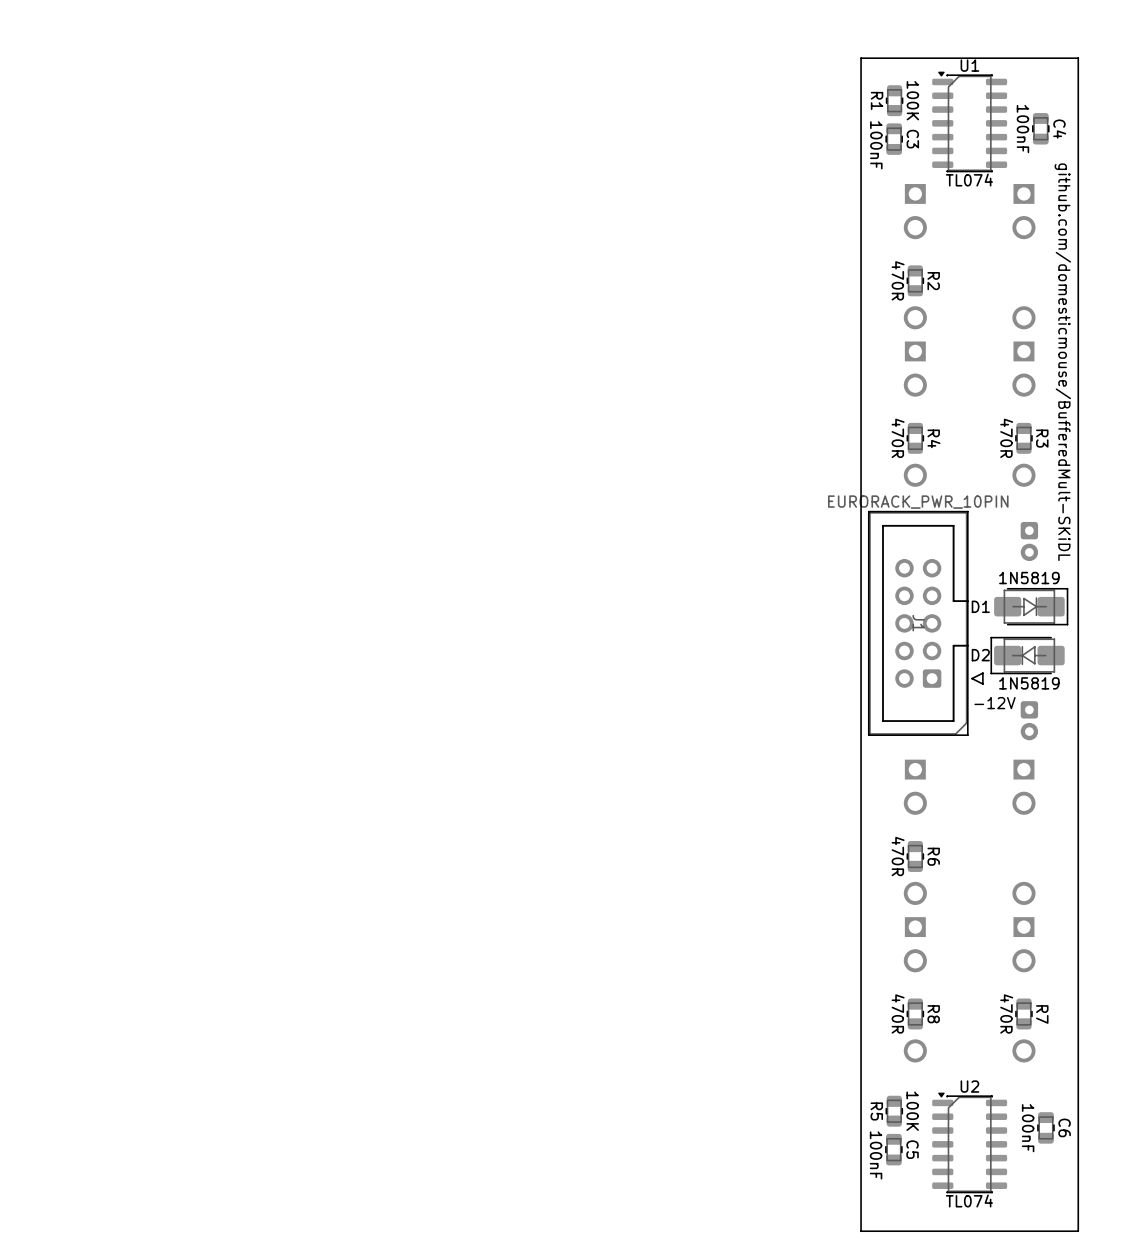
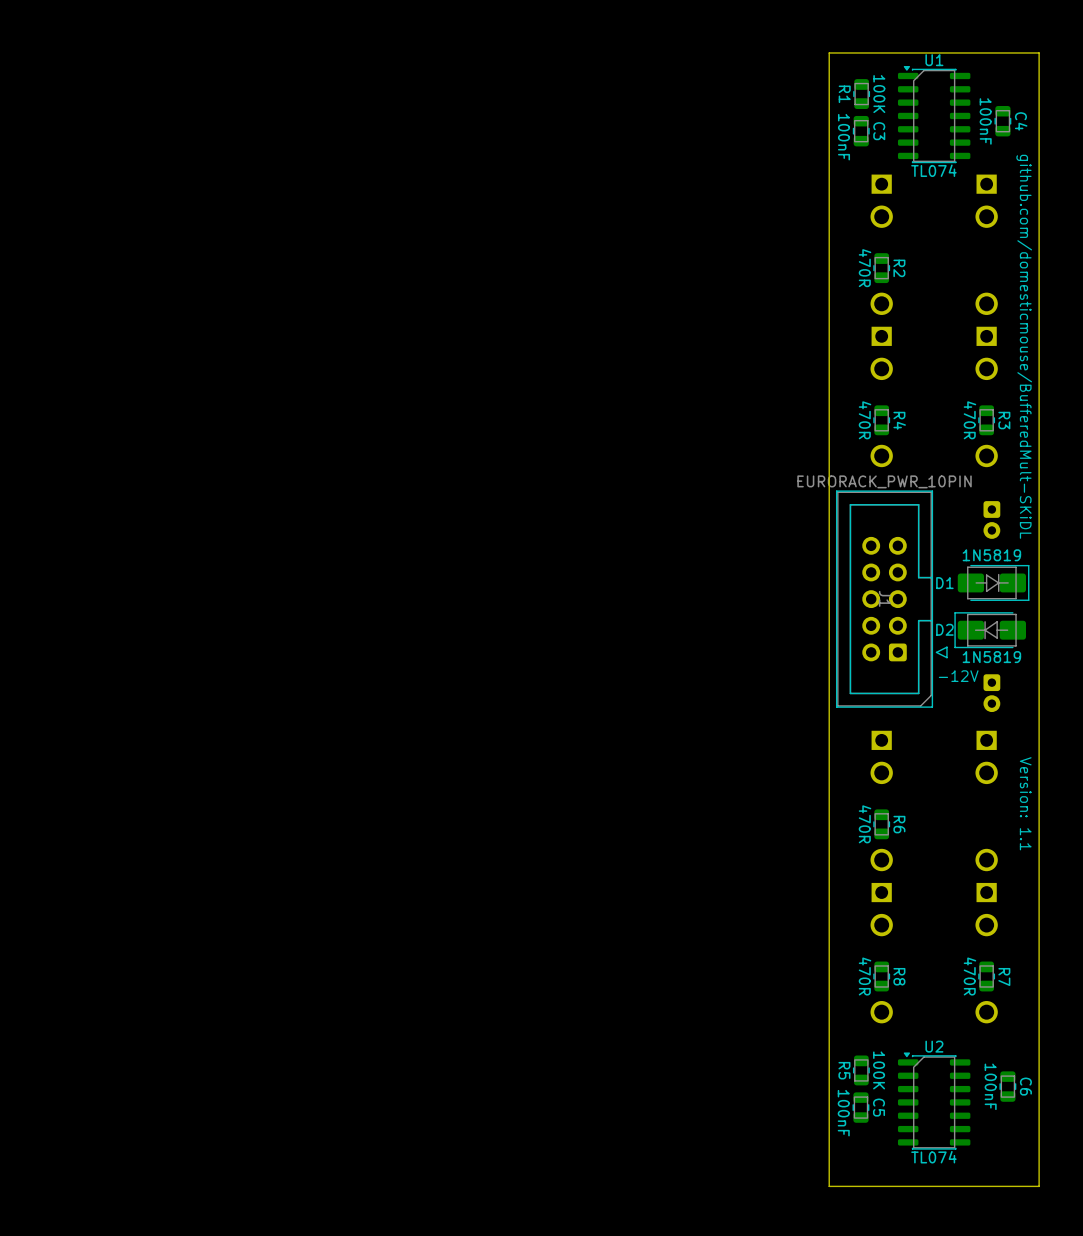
text: none -> Version: 1.1 (1025, 803)

